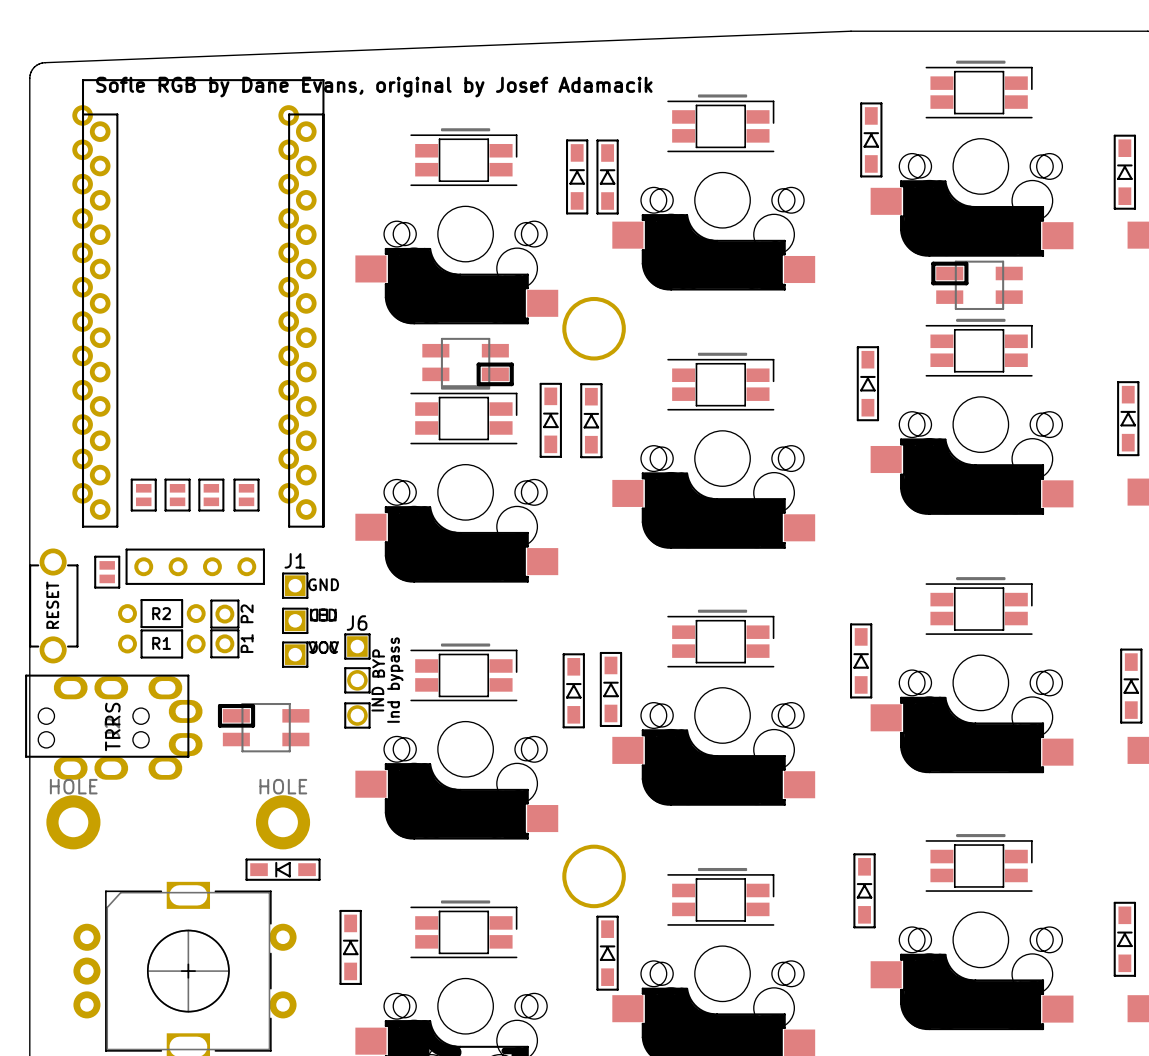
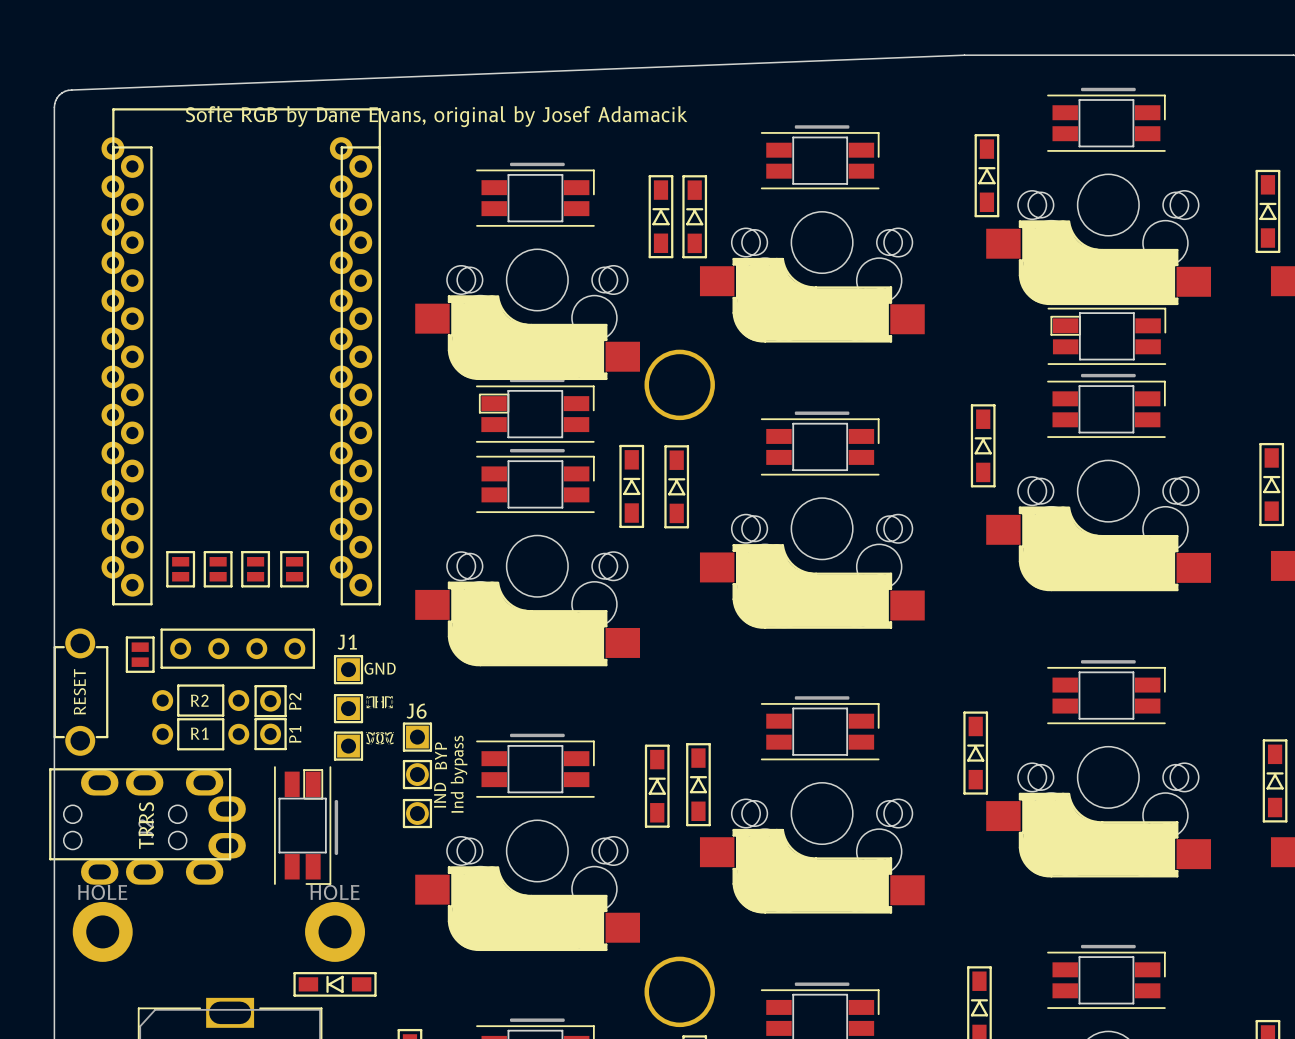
part footprint: [931, 260, 1023, 311] -> [1047, 300, 1167, 365]
part footprint: [422, 337, 514, 388] -> [475, 378, 595, 443]
part footprint: [217, 702, 310, 753] -> [274, 766, 339, 885]

